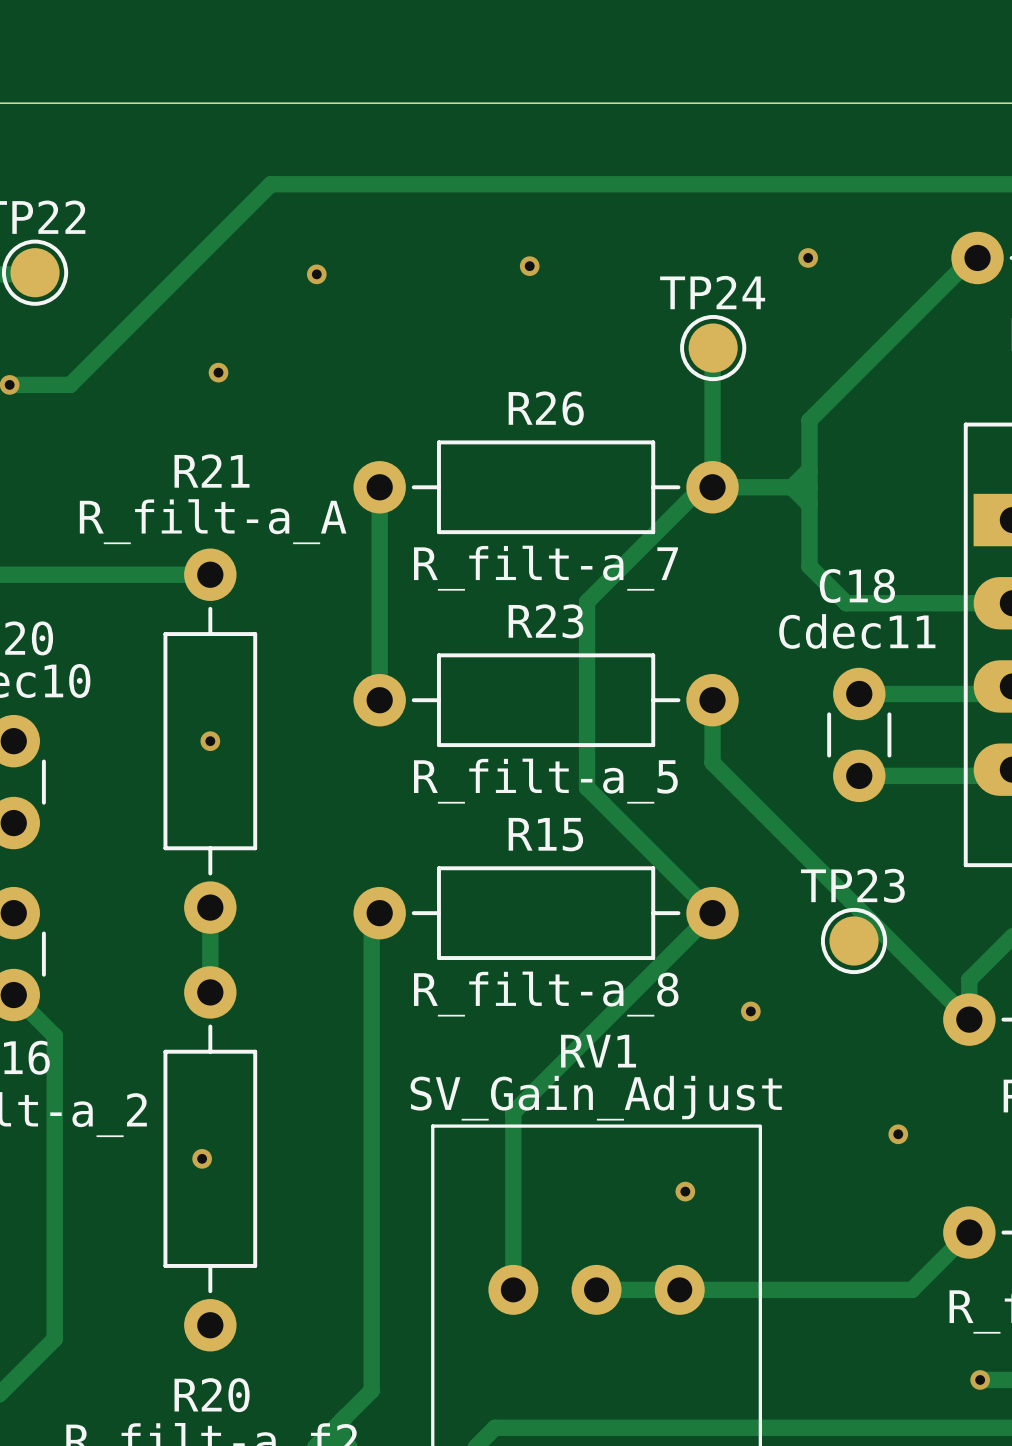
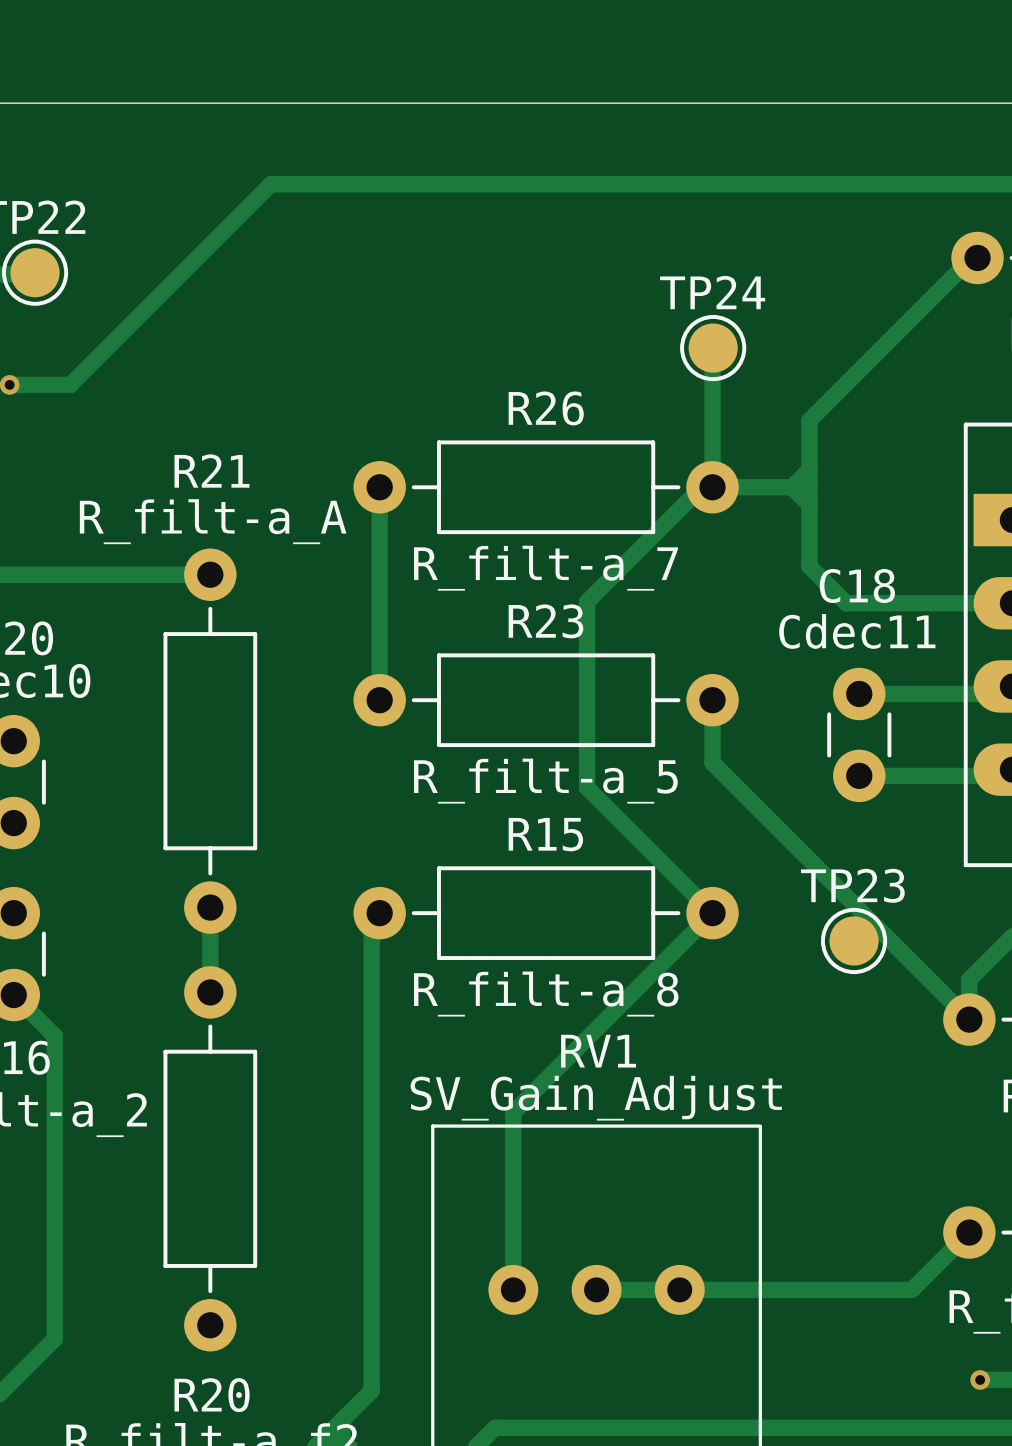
via: (808, 257) -> none
via: (529, 266) -> none
via: (316, 274) -> none
via: (218, 372) -> none
via: (210, 741) -> none
via: (750, 1011) -> none
via: (898, 1134) -> none
via: (202, 1158) -> none
via: (685, 1191) -> none

